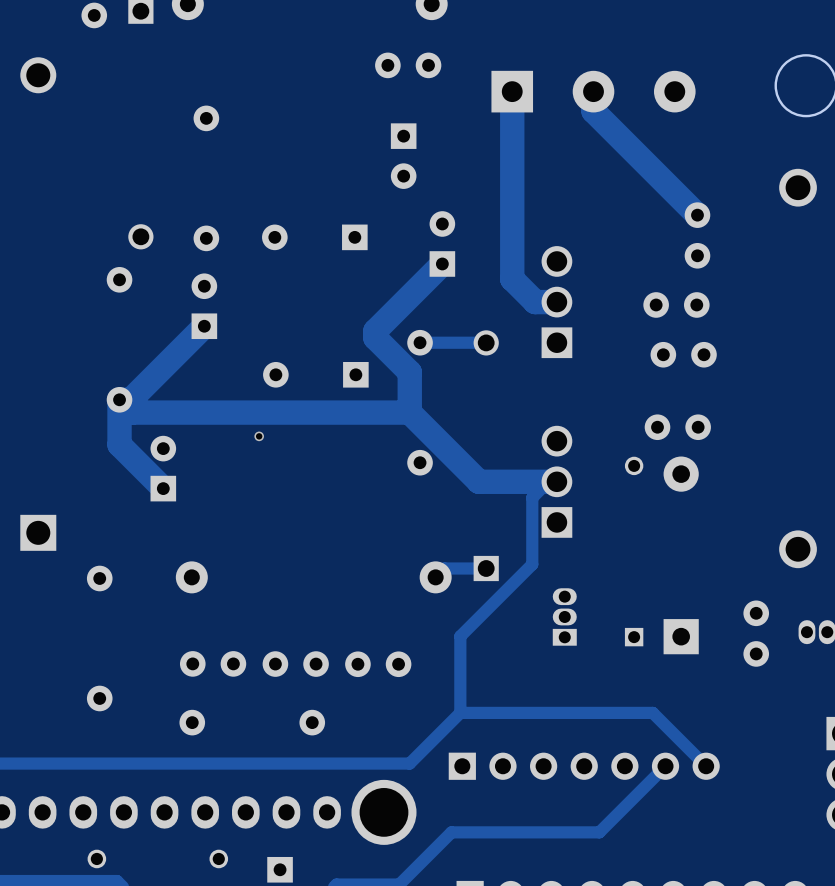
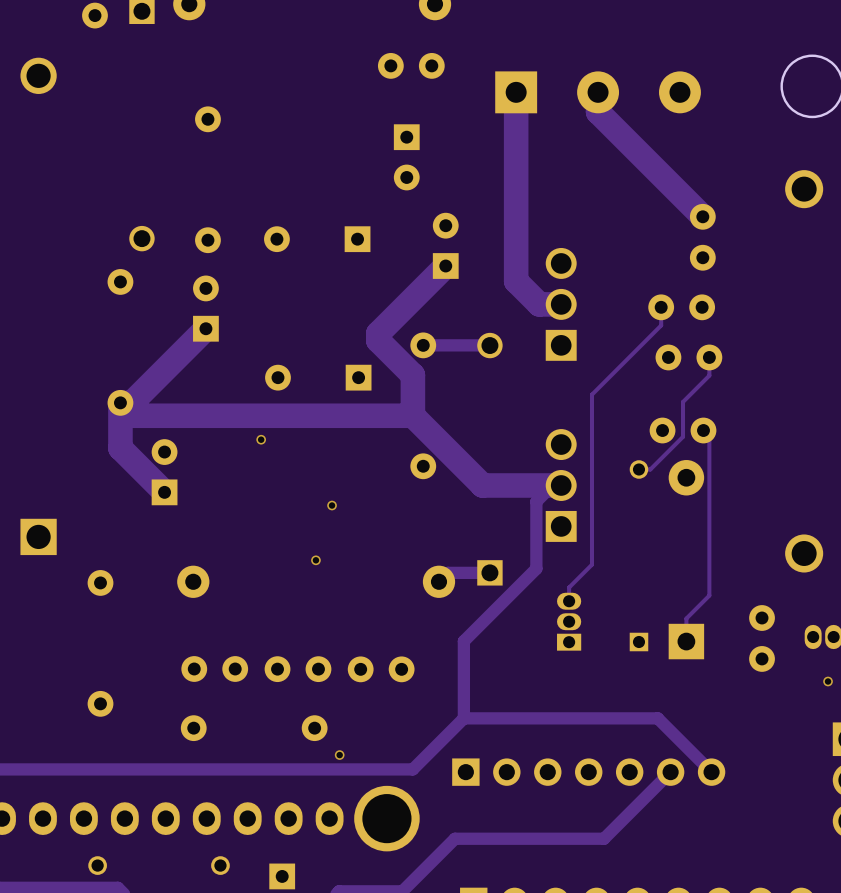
track: none -> (661, 307) (661, 325) (591, 394) (591, 564) (569, 587) (569, 601)
track: none -> (709, 357) (709, 375) (683, 401) (683, 436) (650, 469) (638, 469)
track: none -> (709, 436) (709, 595) (686, 618) (686, 641)
via: none -> (332, 505)
via: none -> (315, 560)
via: none -> (828, 681)
via: none -> (339, 755)

